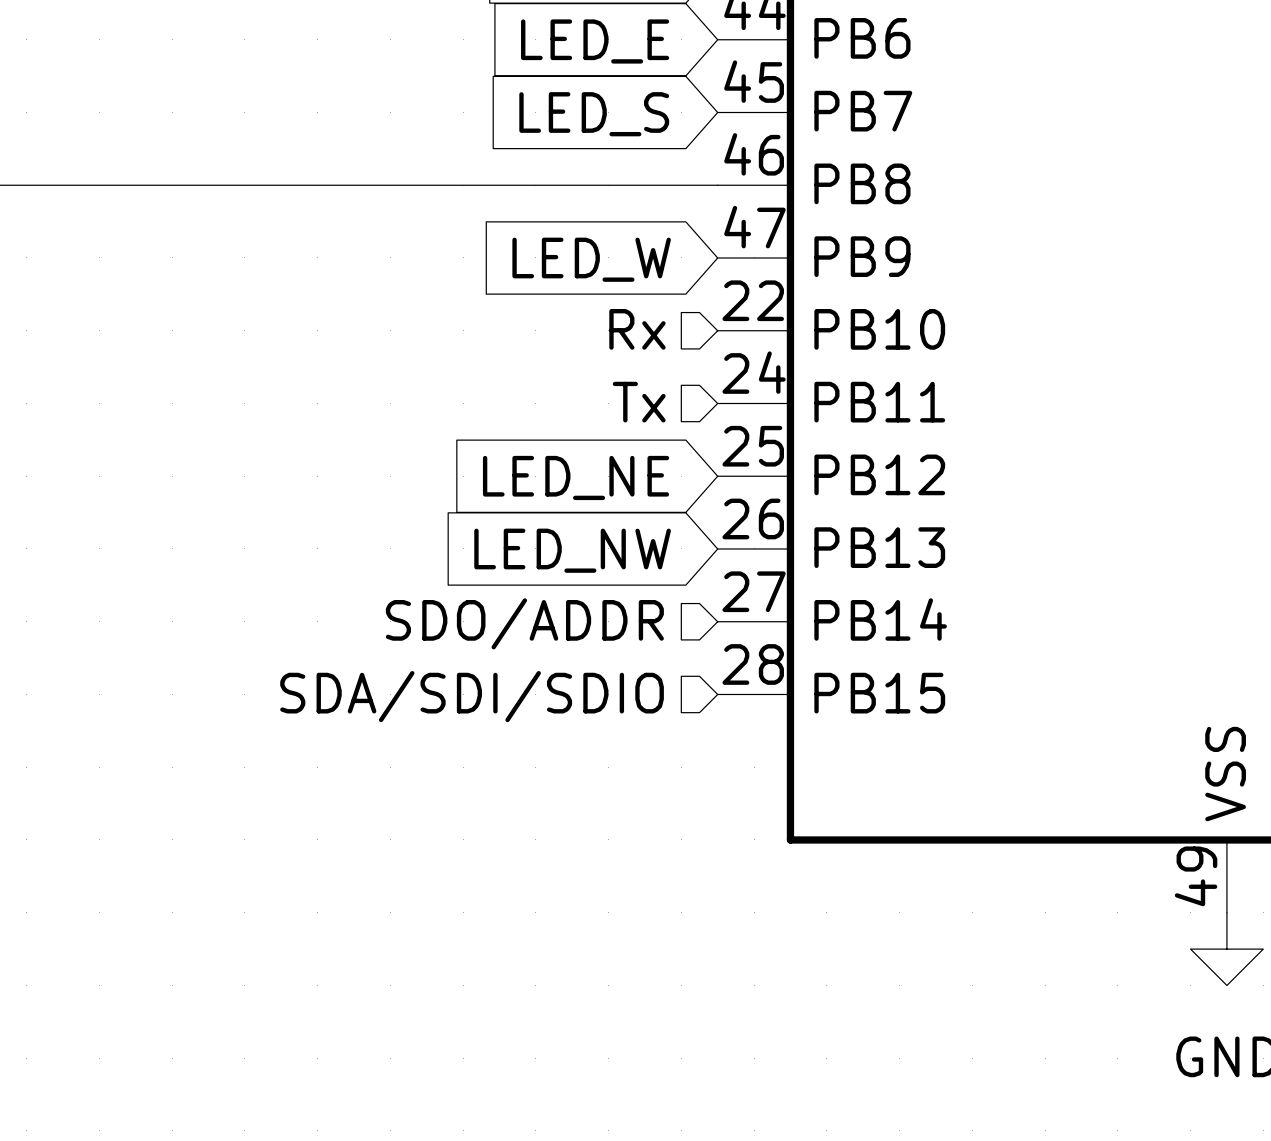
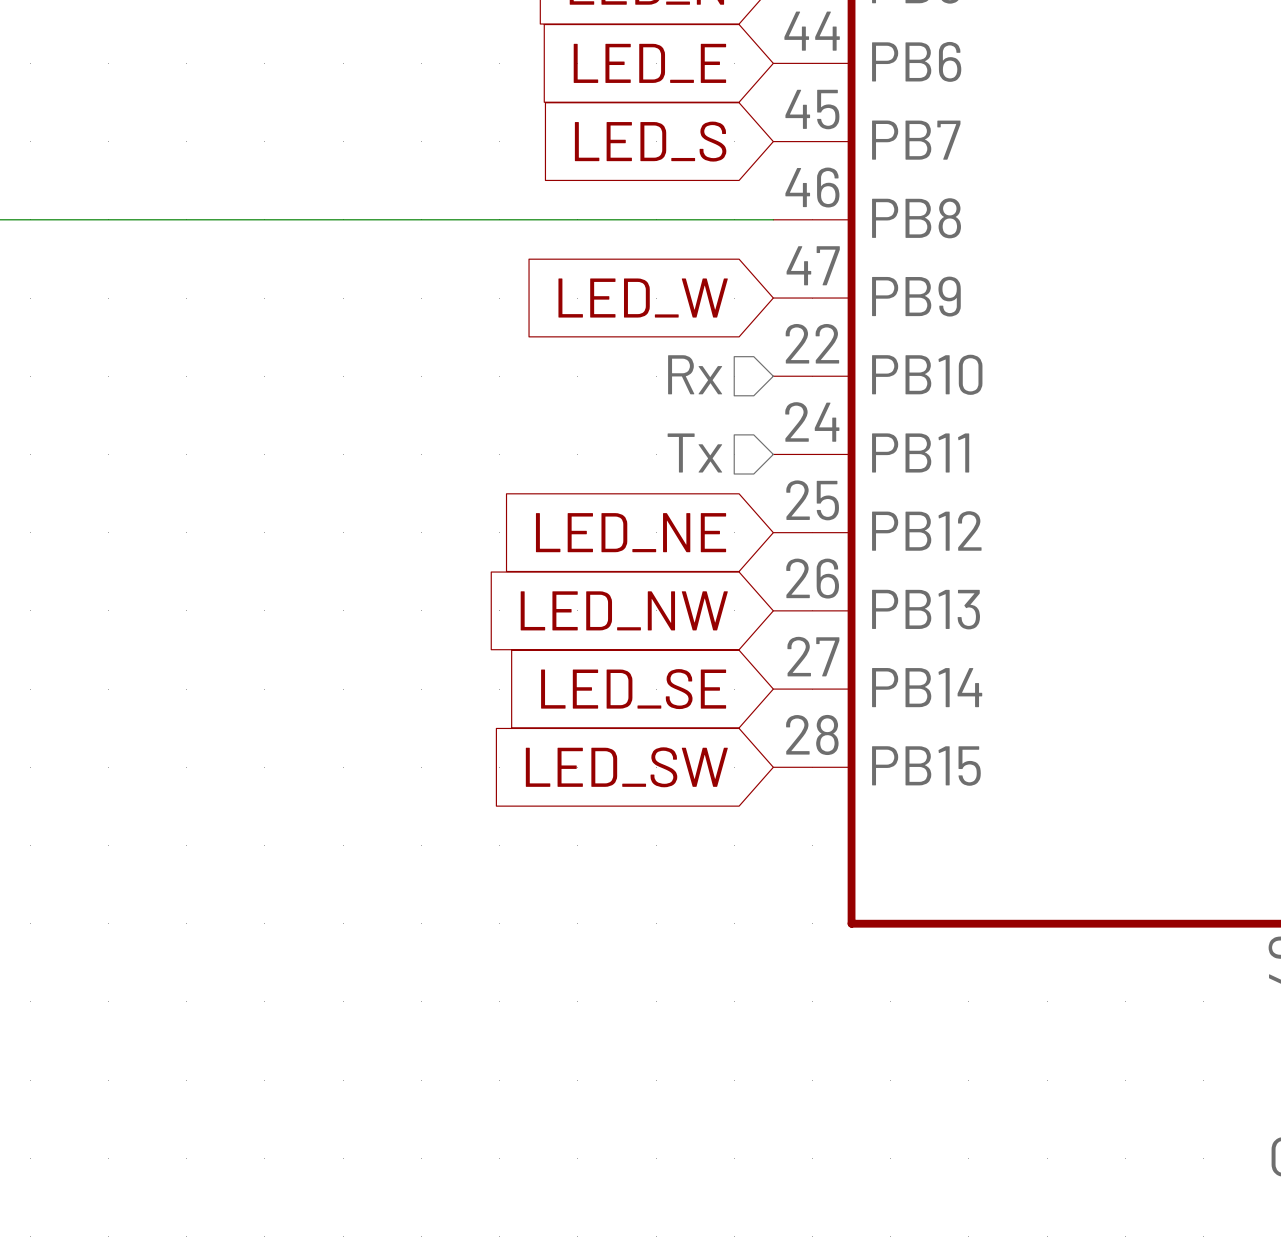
hierarchical label: SDO/ADDR (524, 623) -> none
global label: none -> LED_SE (633, 689)
hierarchical label: SDA/SDI/SDIO (472, 696) -> none
global label: none -> LED_SW (626, 767)

